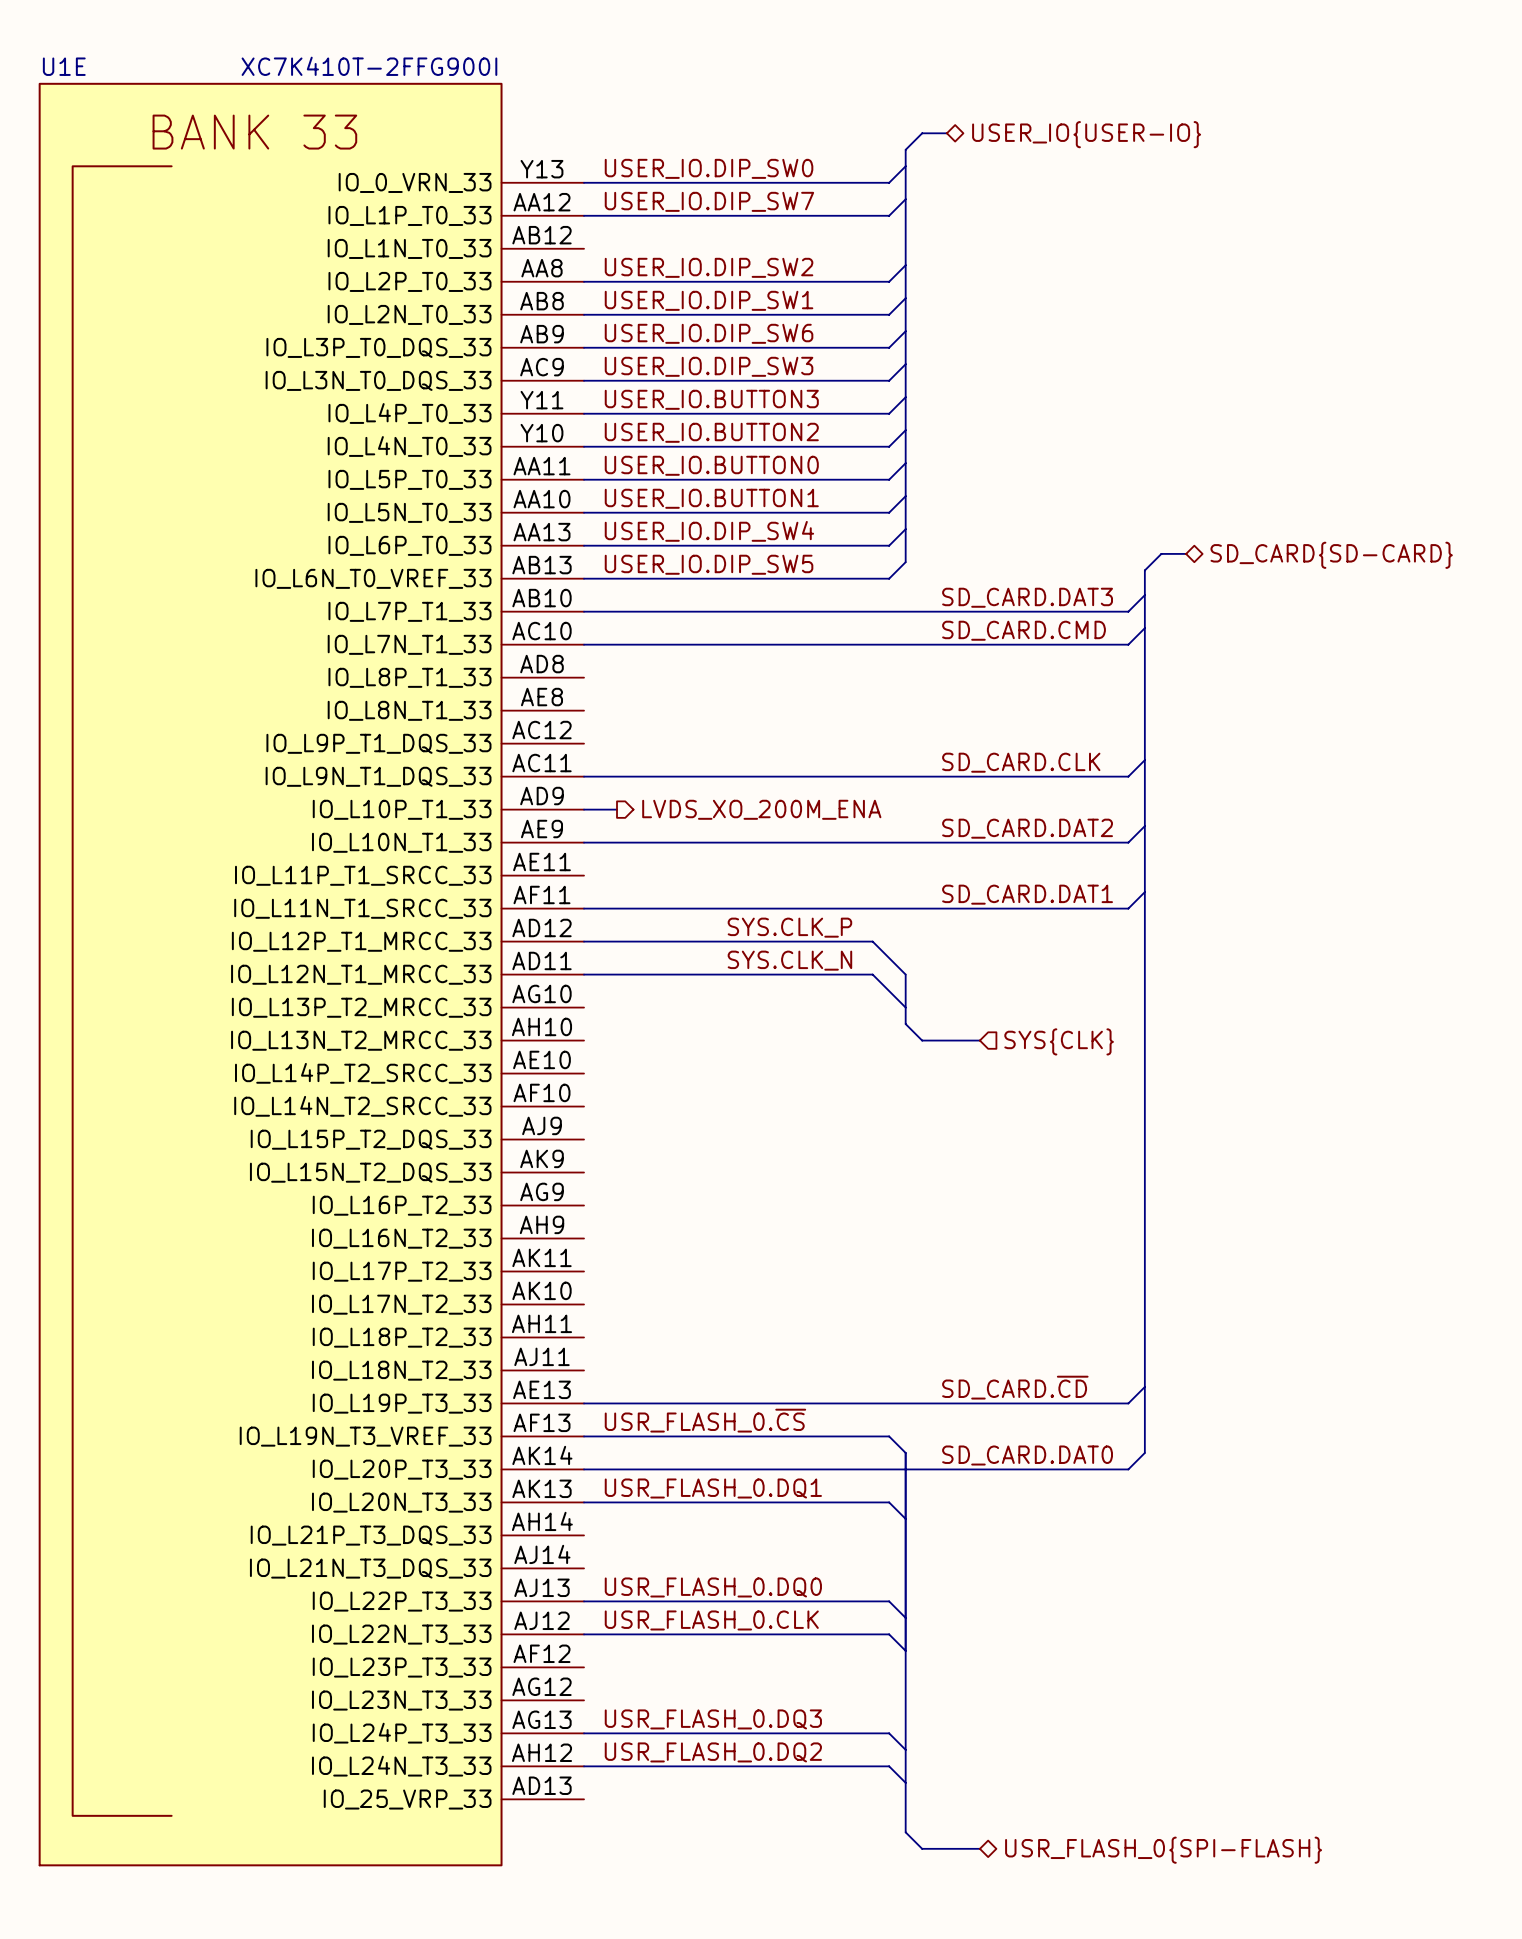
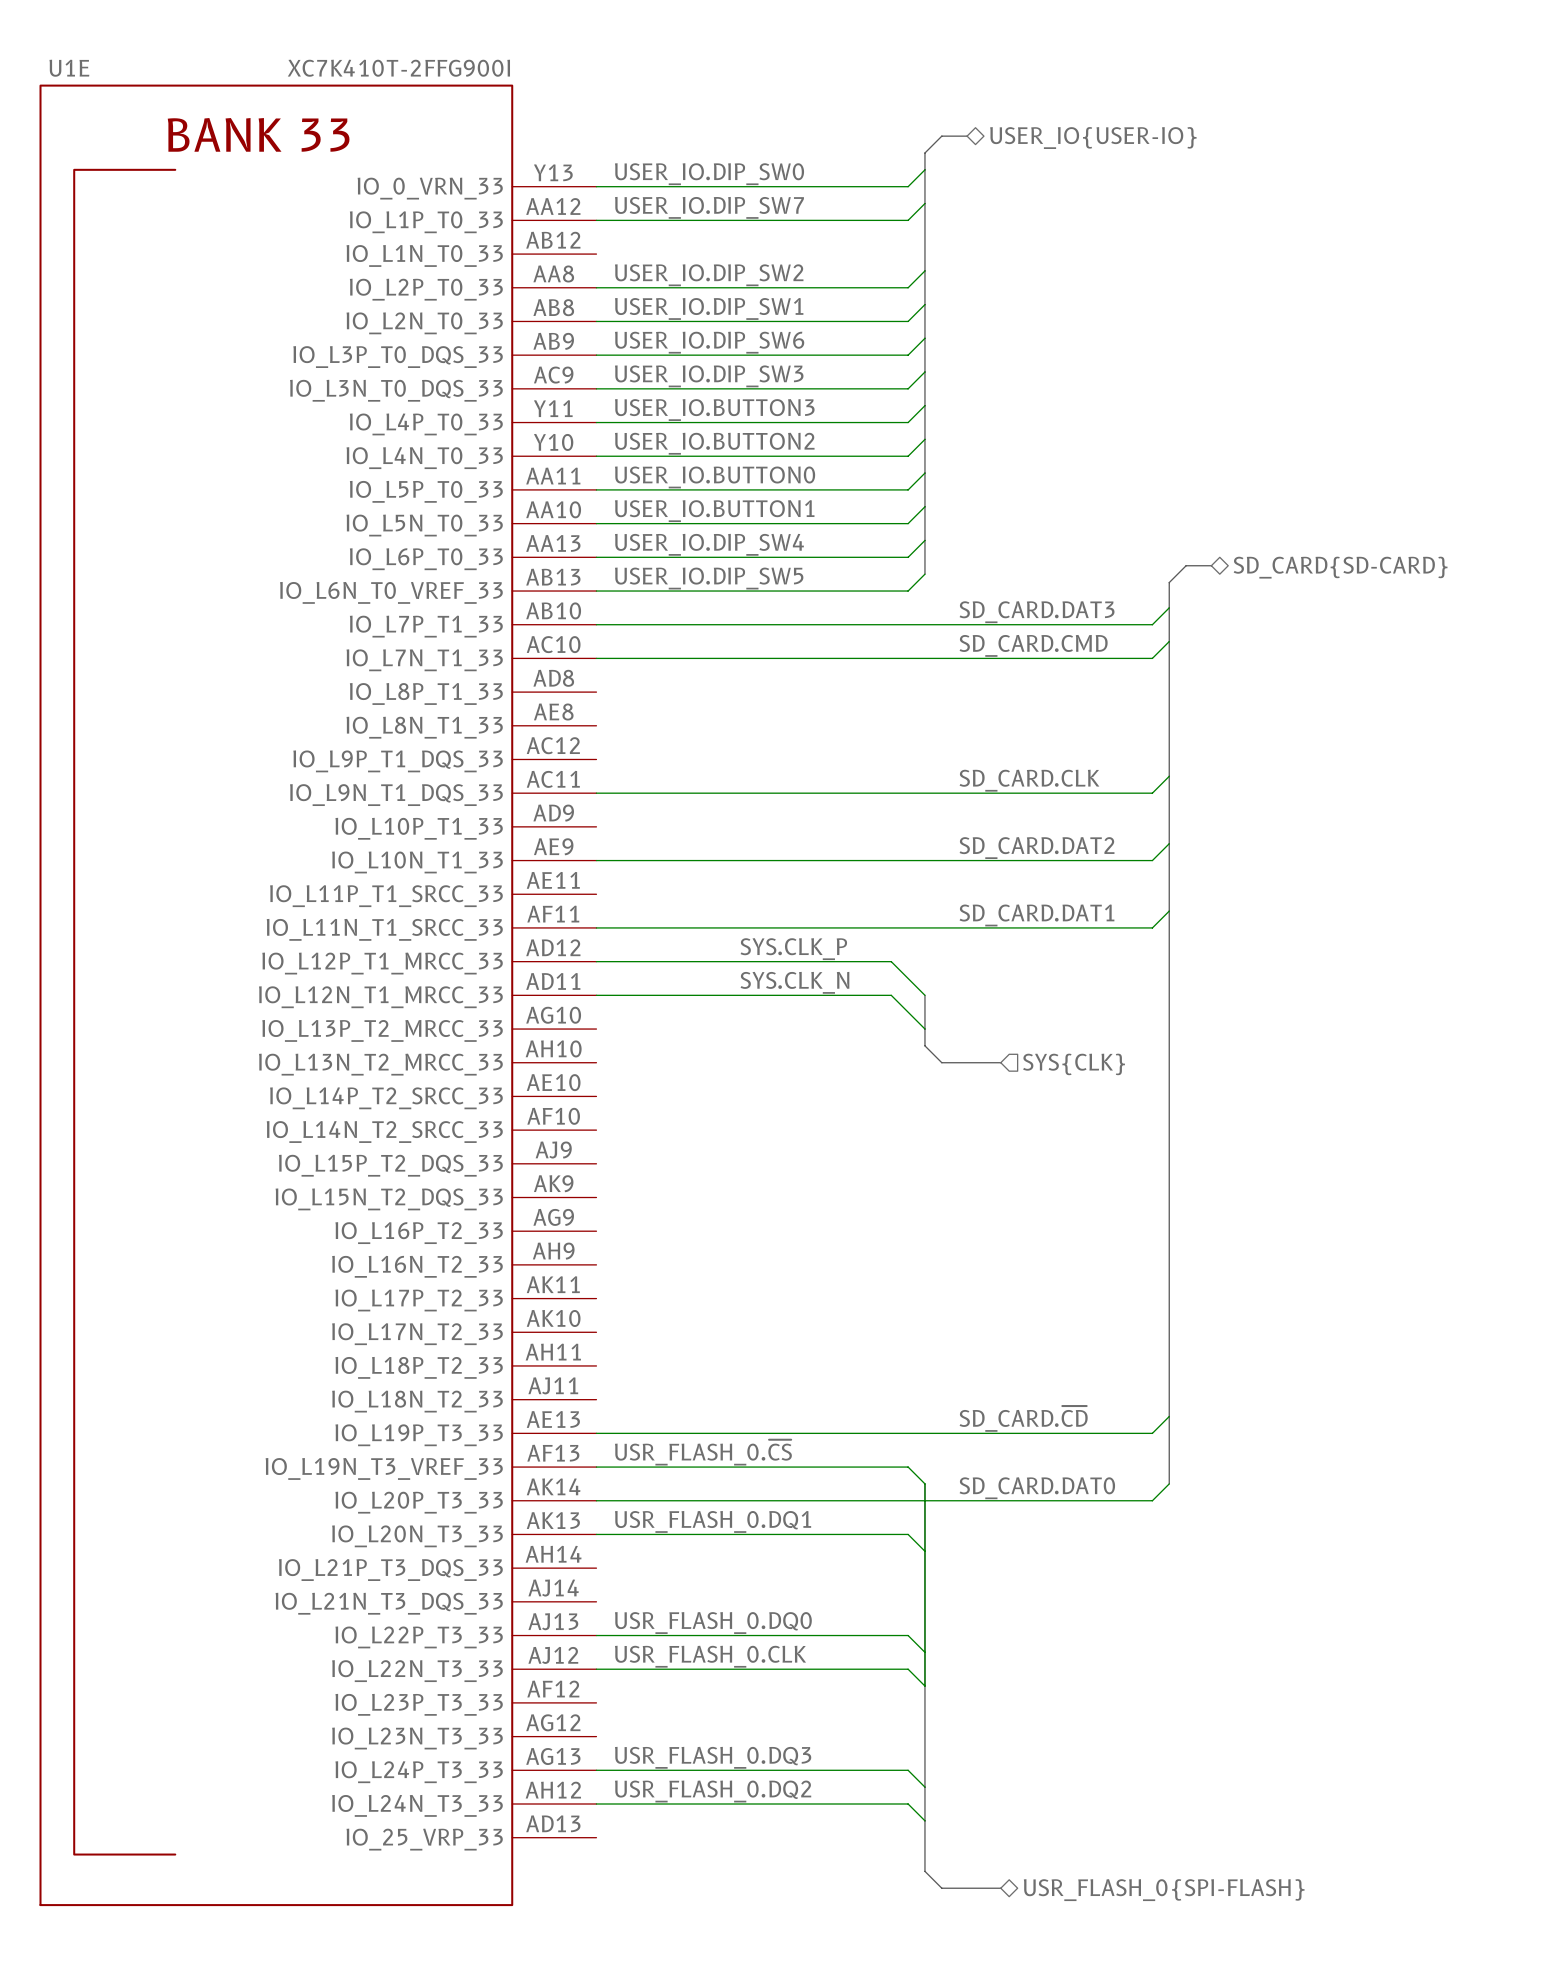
wire: (584, 809) (617, 809) -> none
hierarchical label: LVDS_XO_200M_ENA (761, 809) -> none

